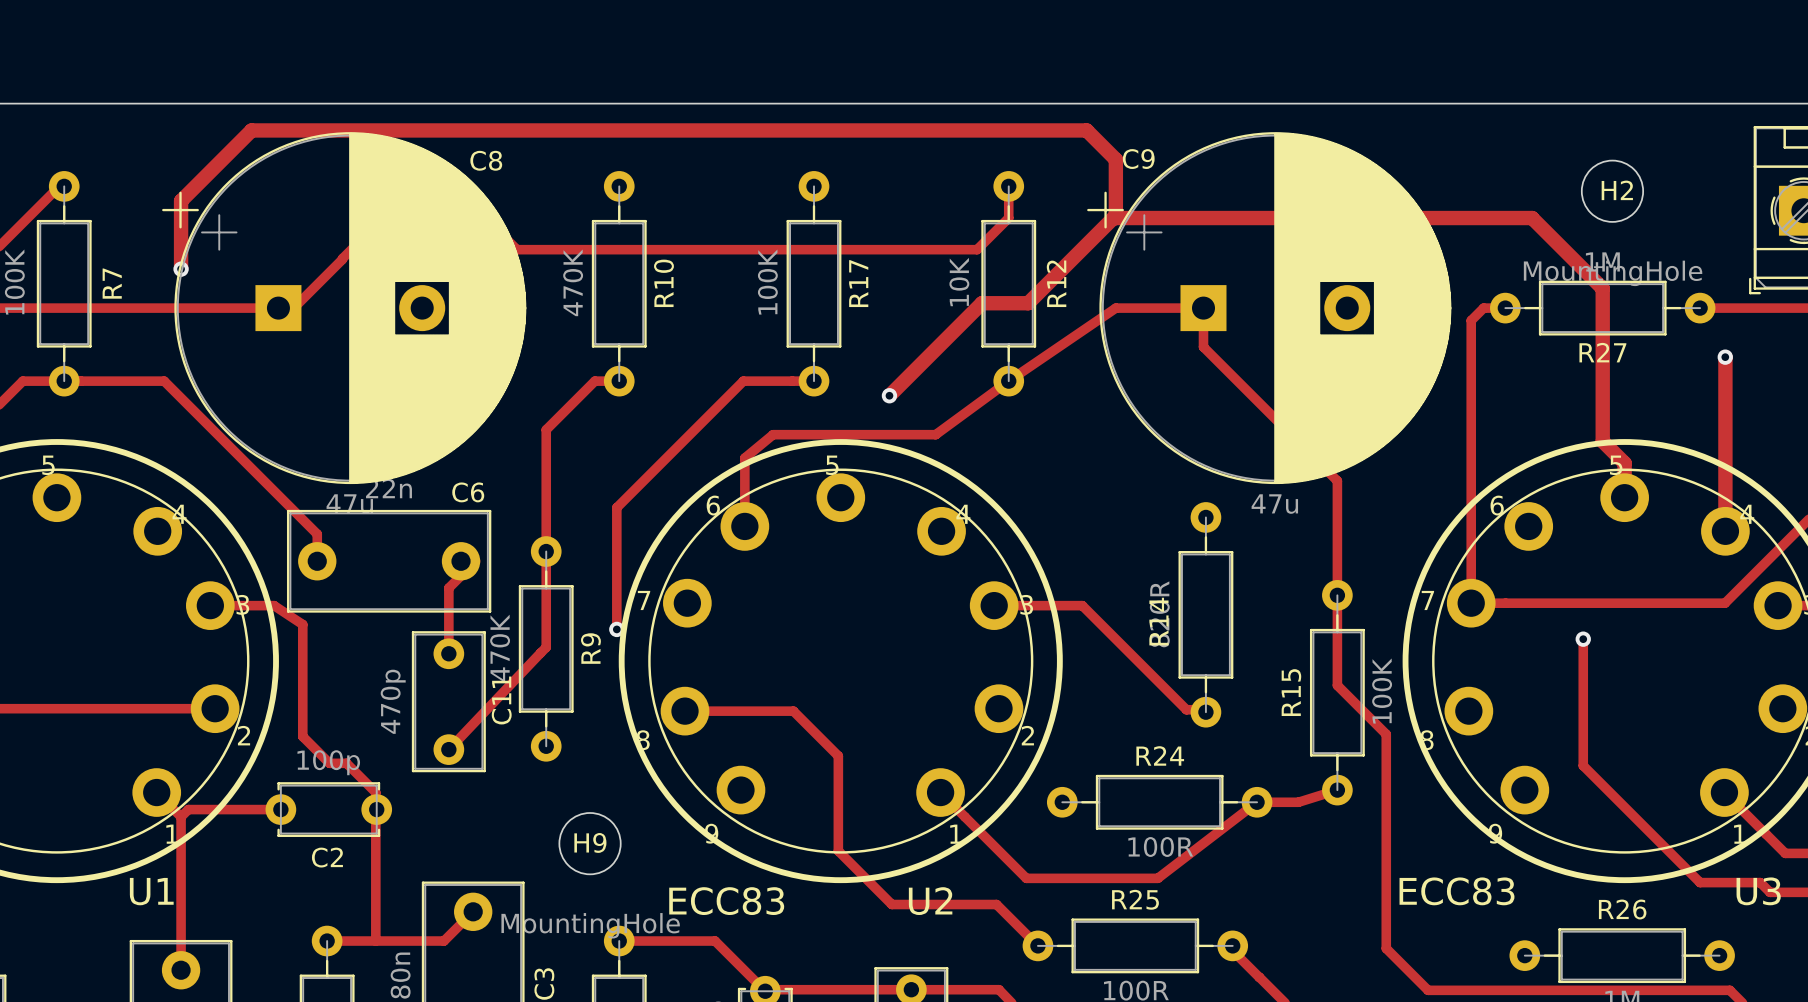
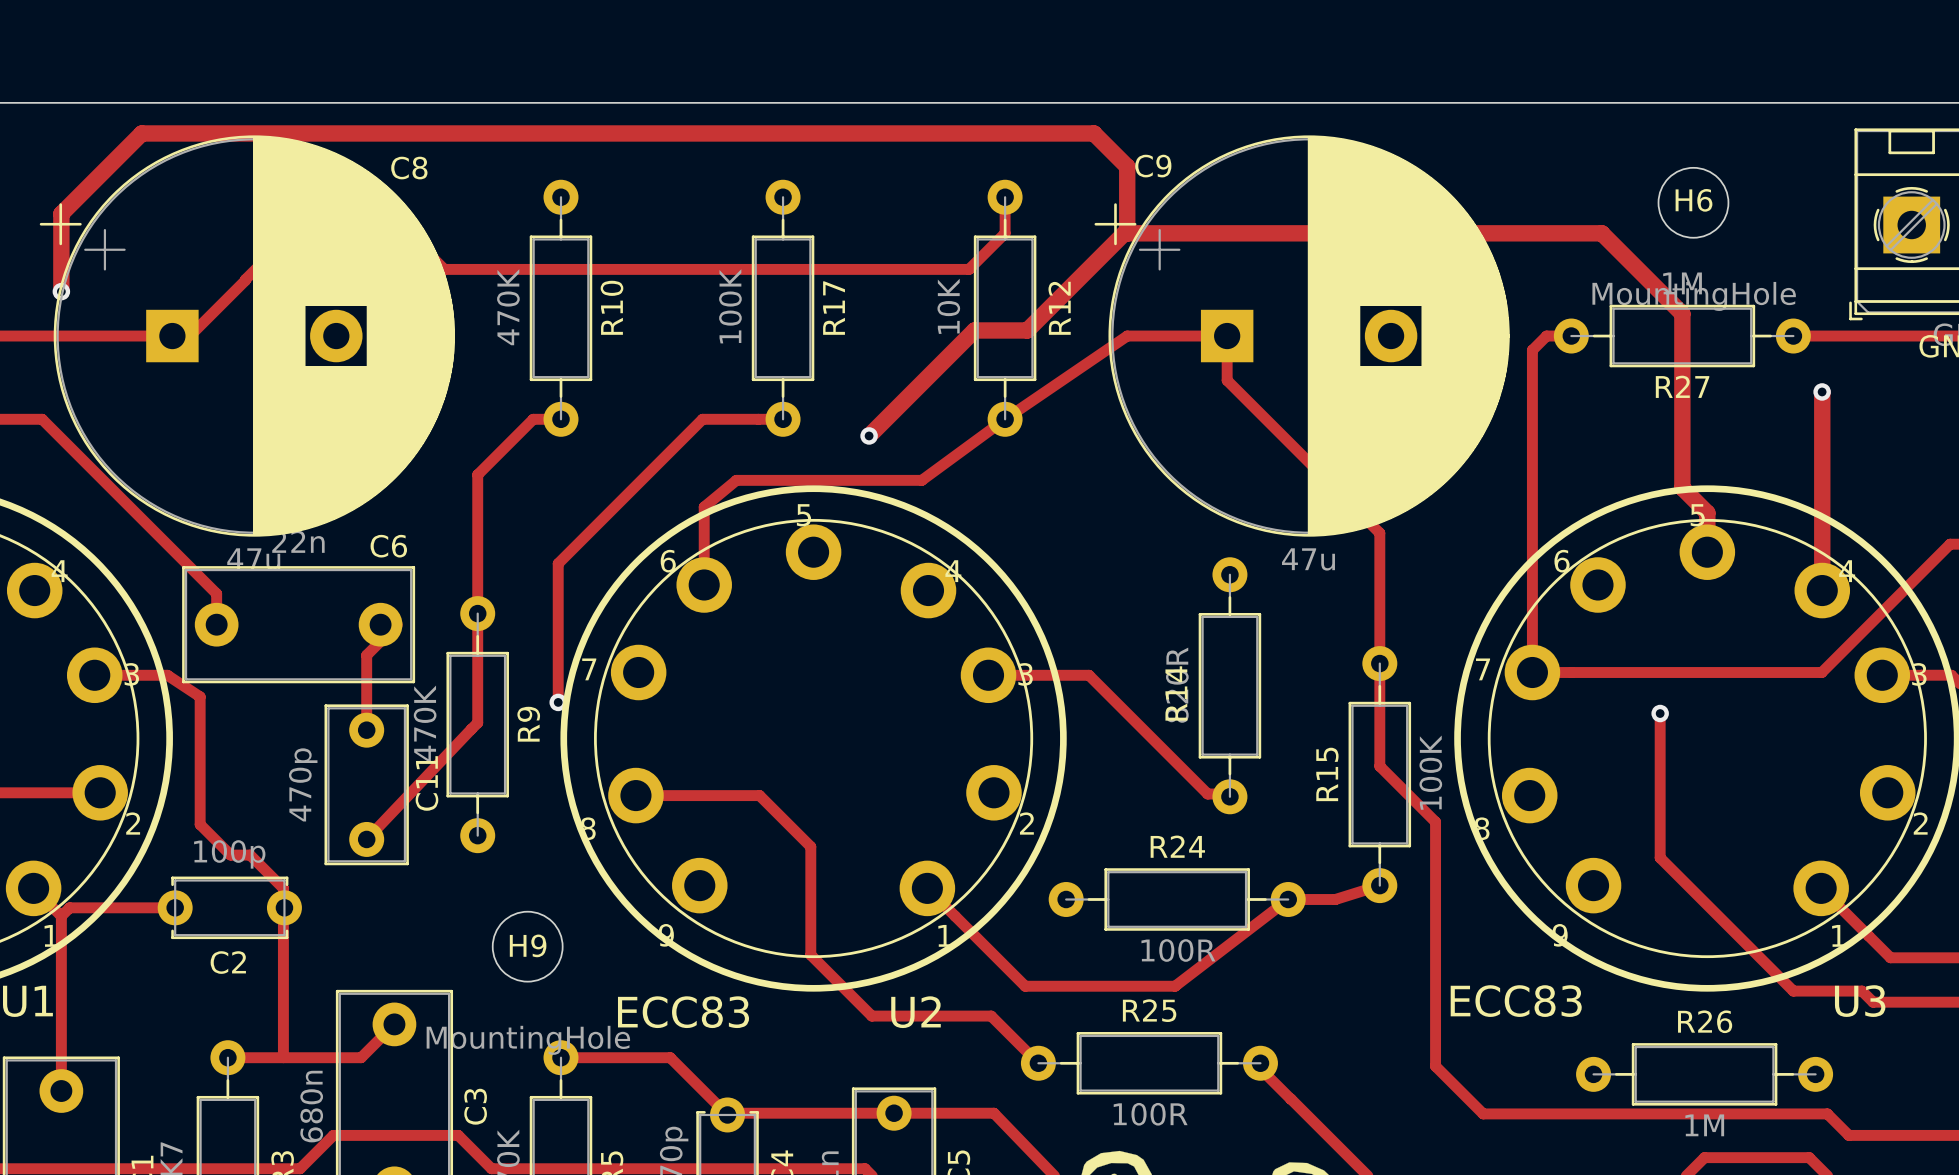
H2 name: H2 (1617, 190) -> H6 (1694, 200)

